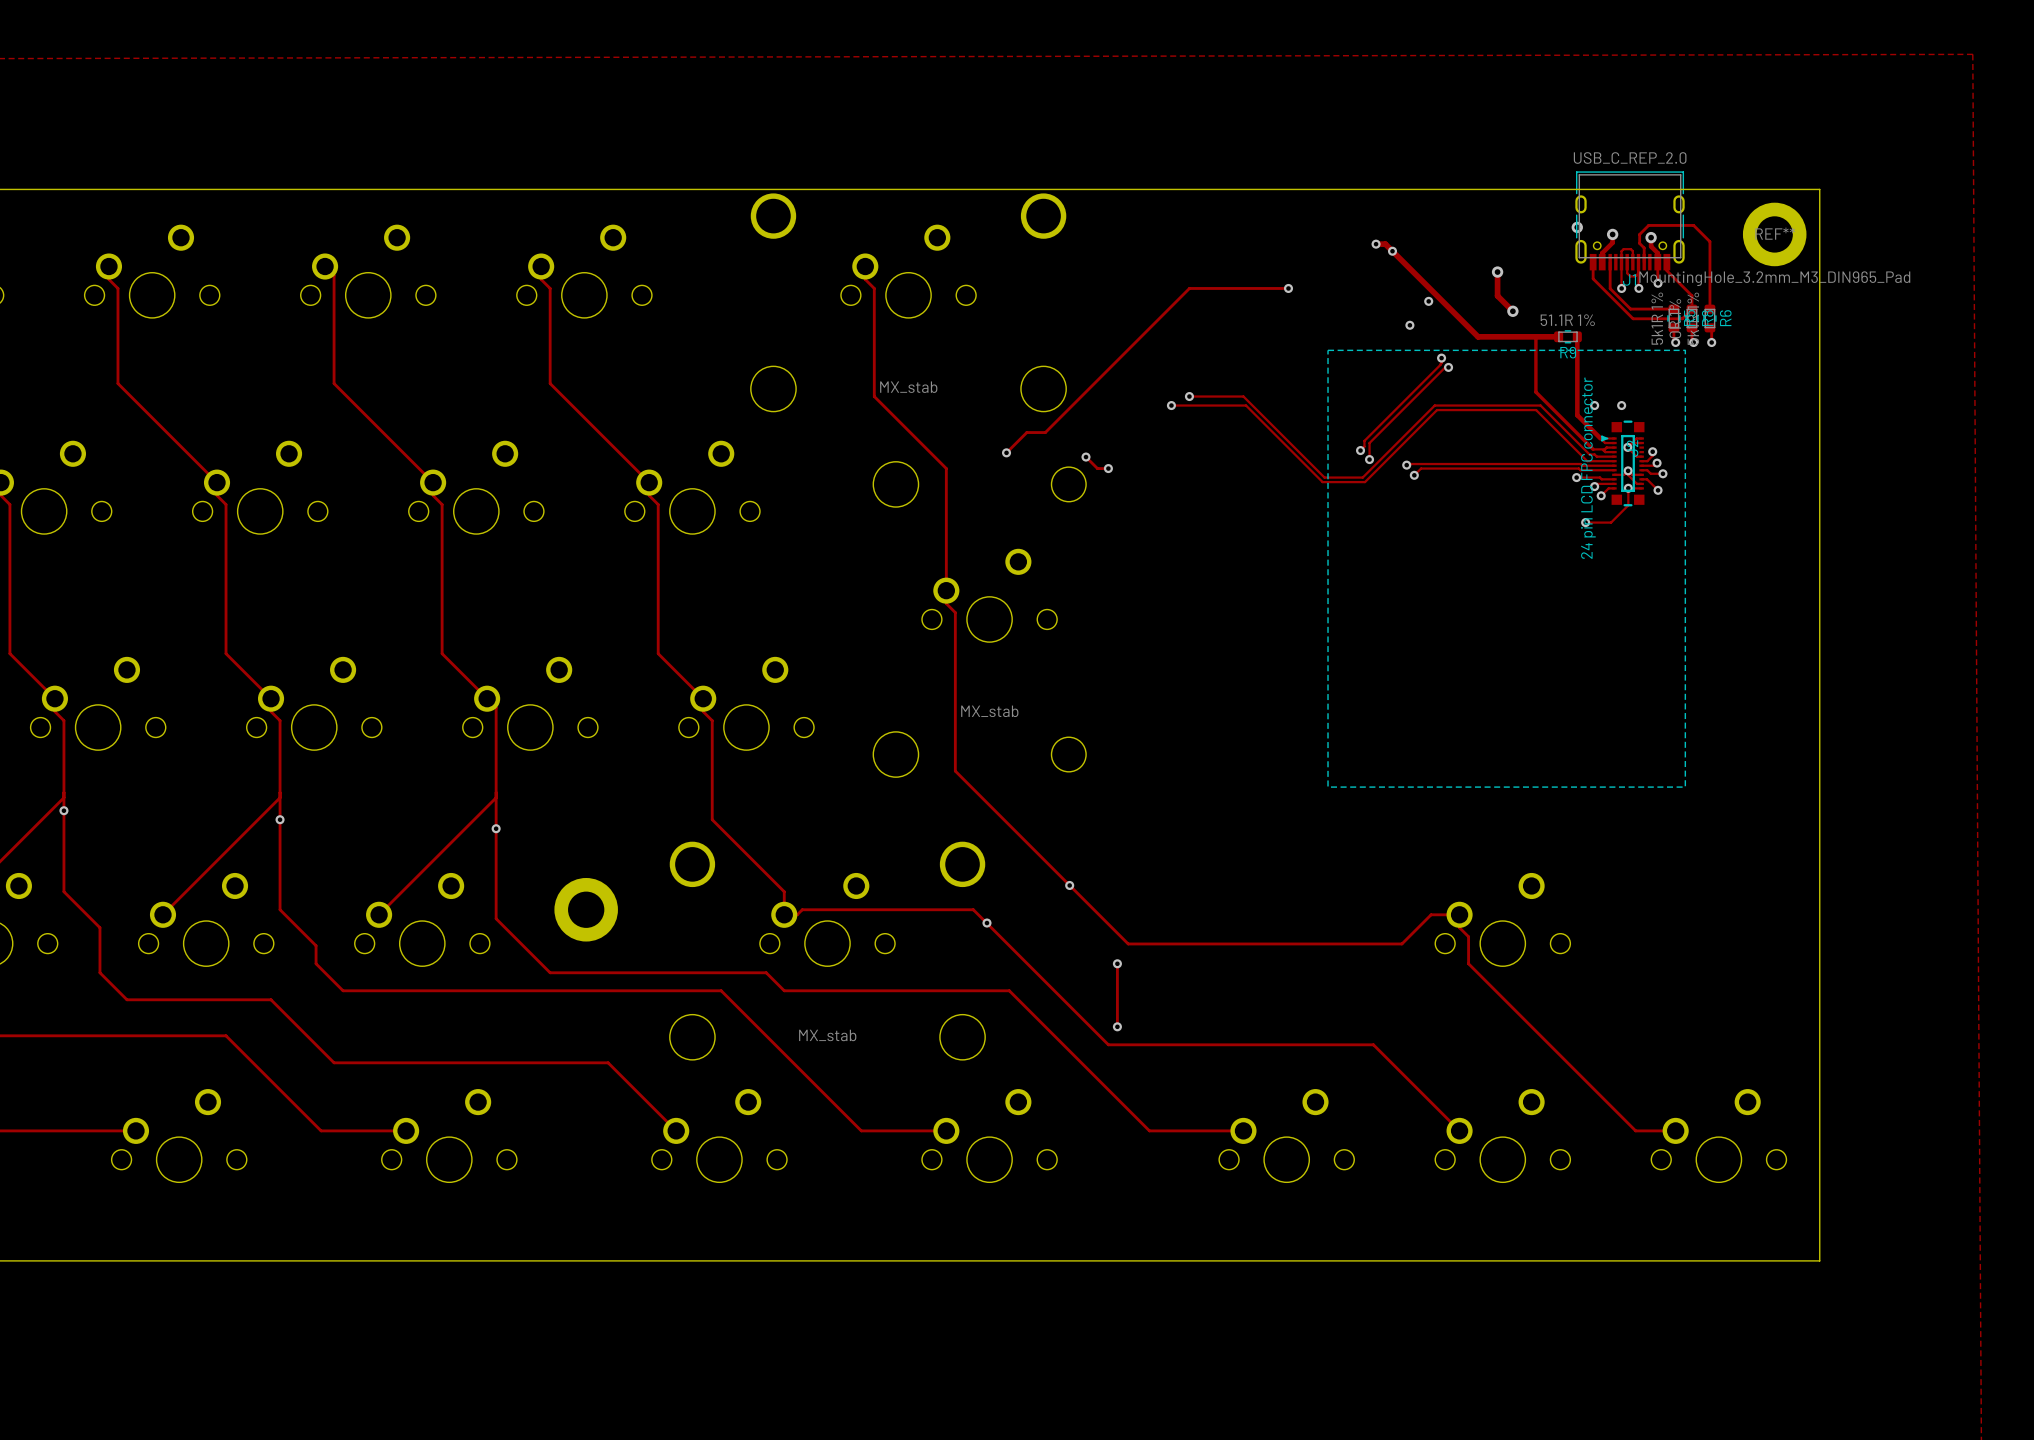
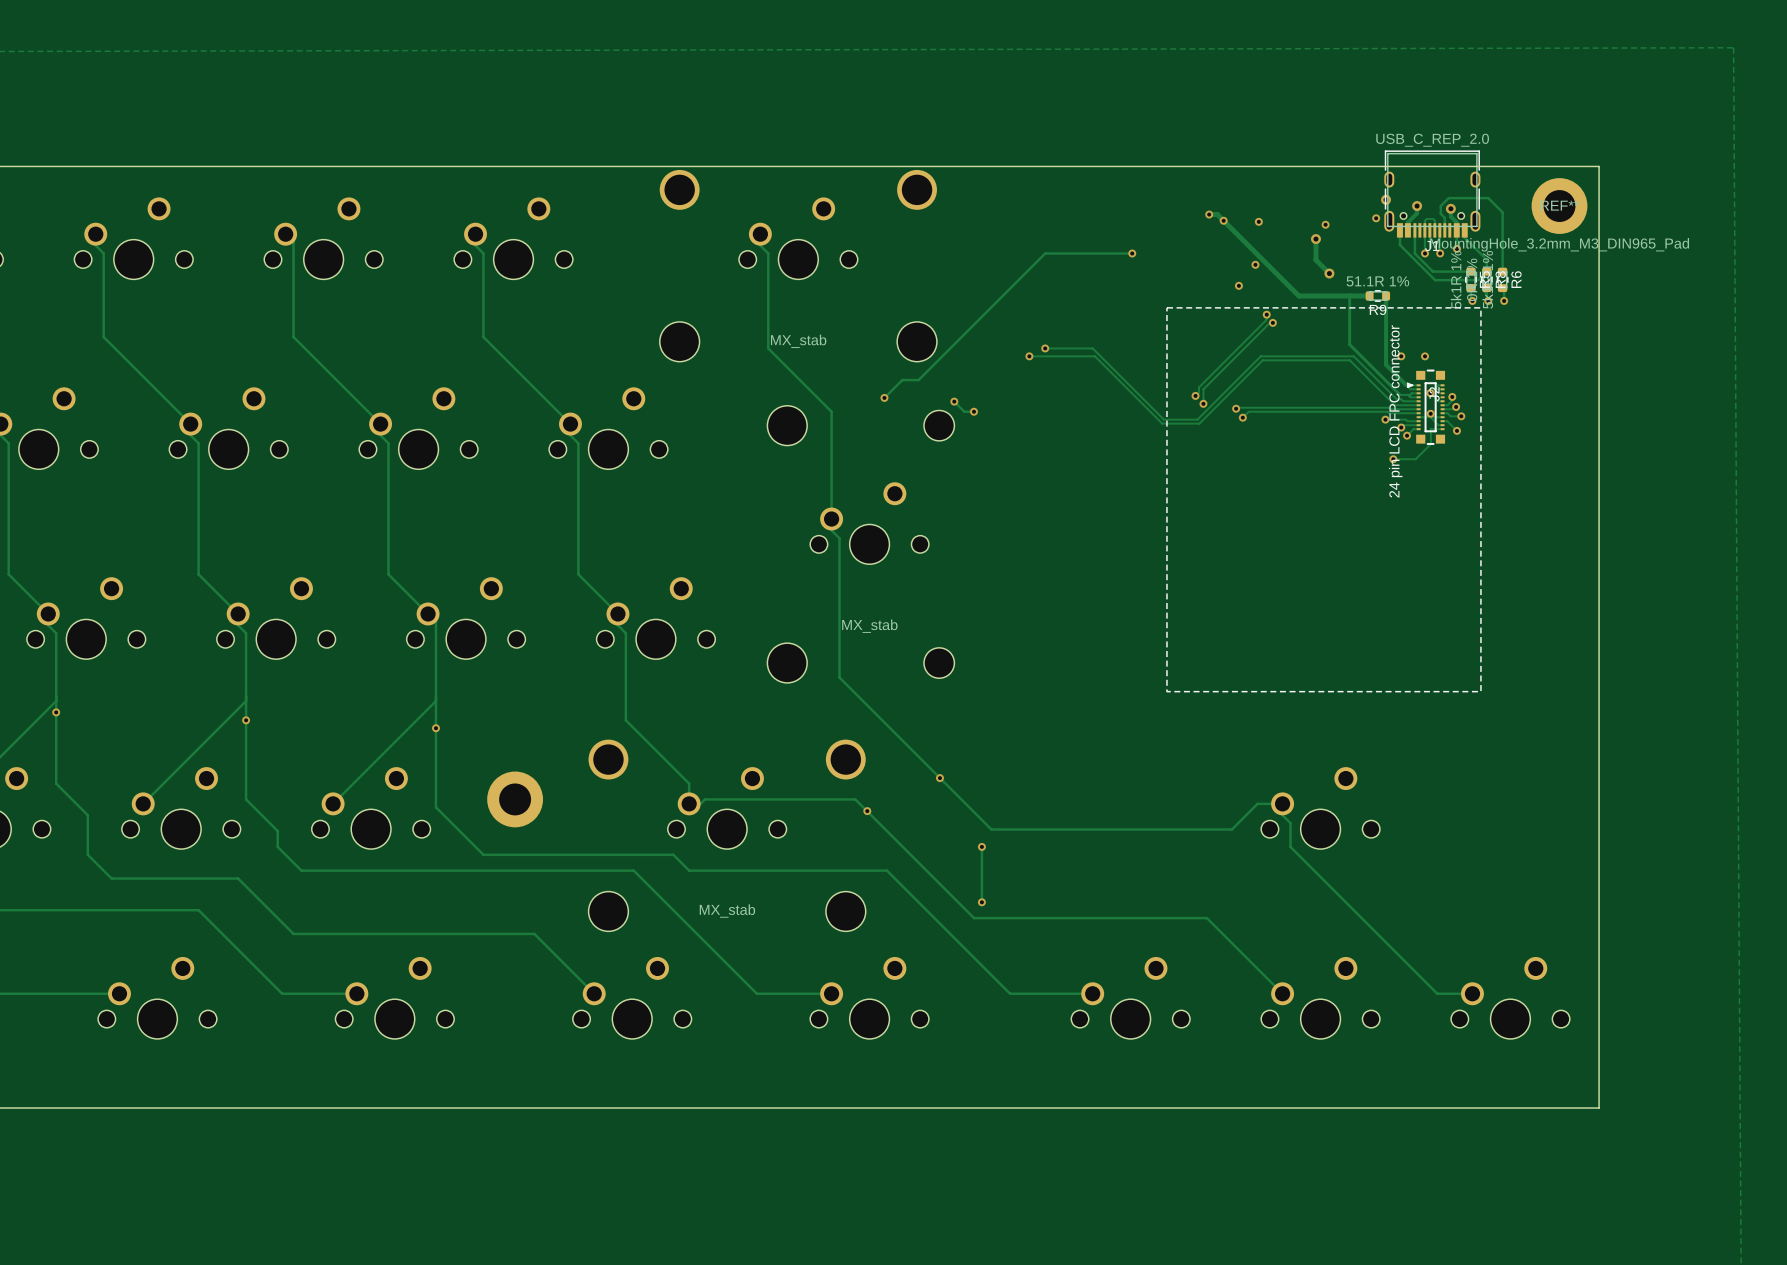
via: none -> (1376, 218)
via: none -> (1258, 221)
via: none -> (1325, 224)
via: (1628, 488) -> none

